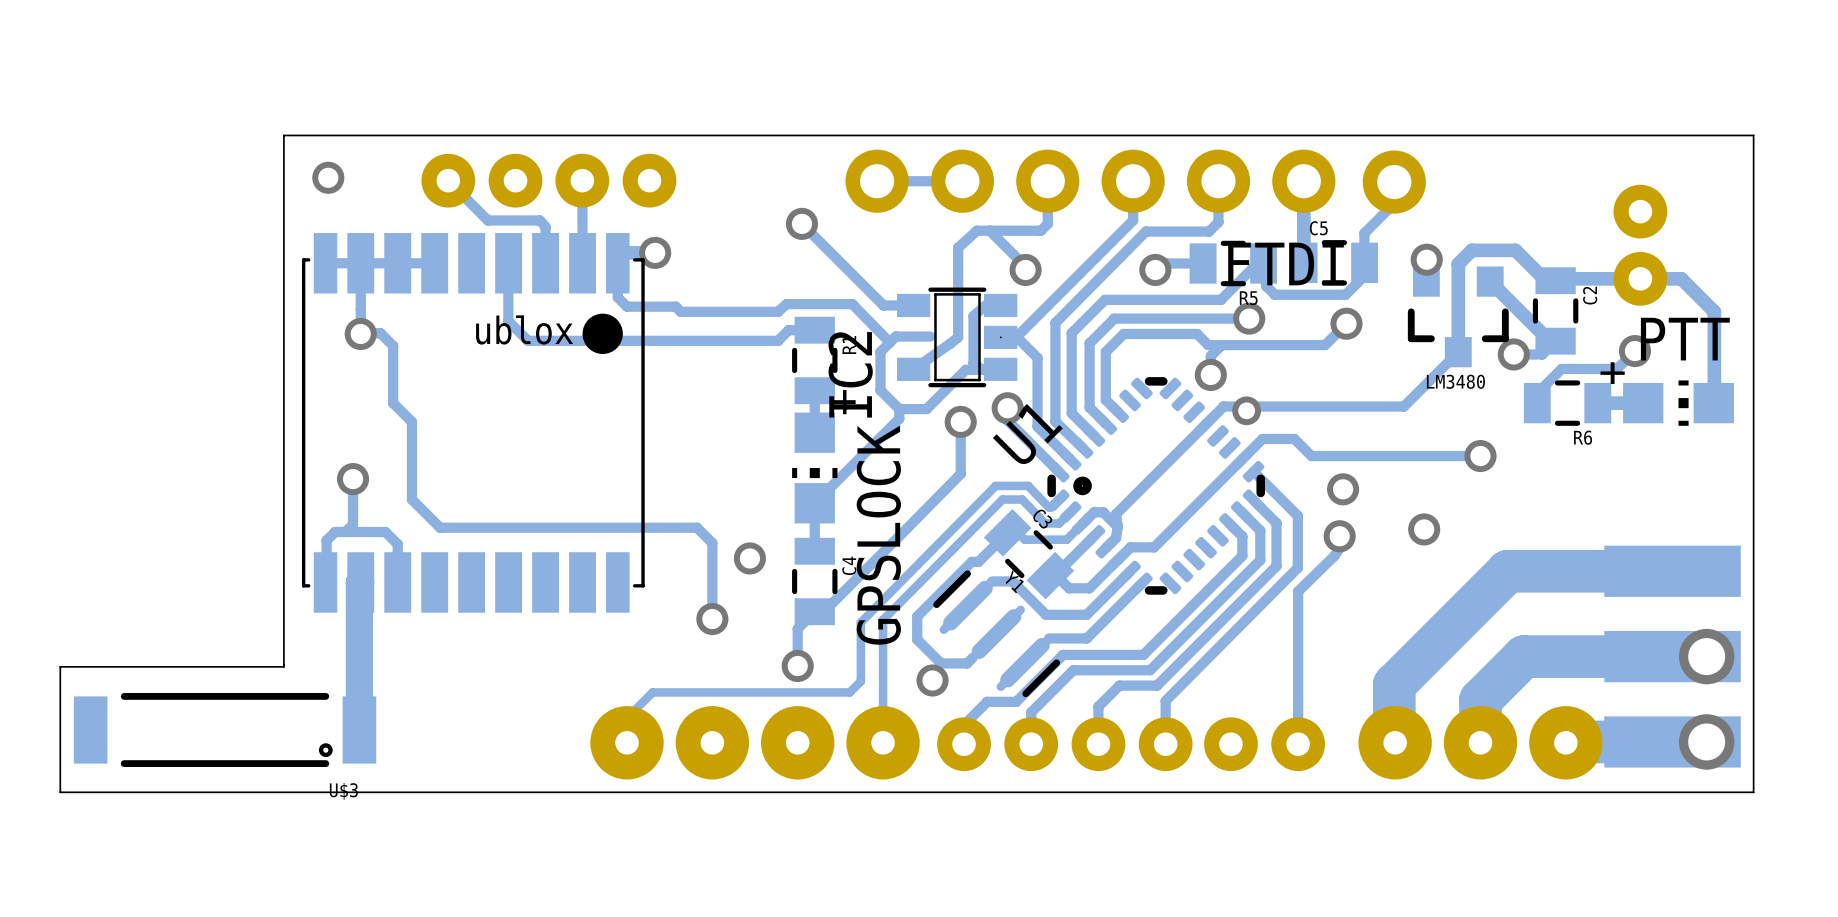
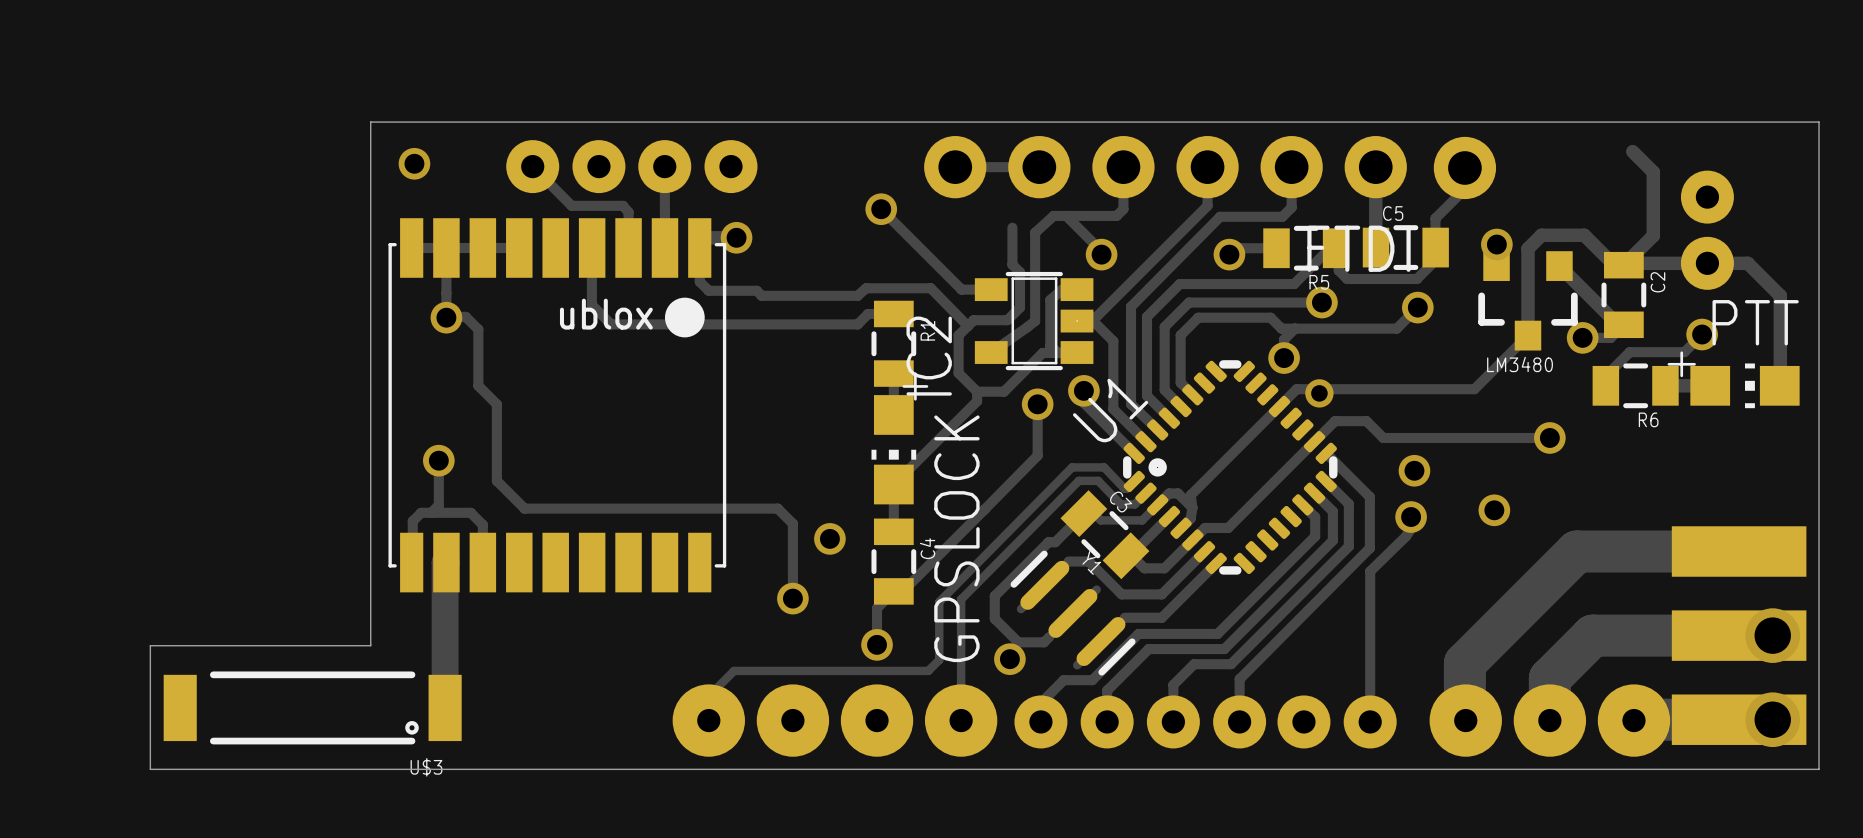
track: none -> (1632, 151) (1653, 172) (1653, 235) (1625, 263)
track: none -> (1012, 227) (1012, 264) (1020, 272) (1020, 307) (1007, 320)

